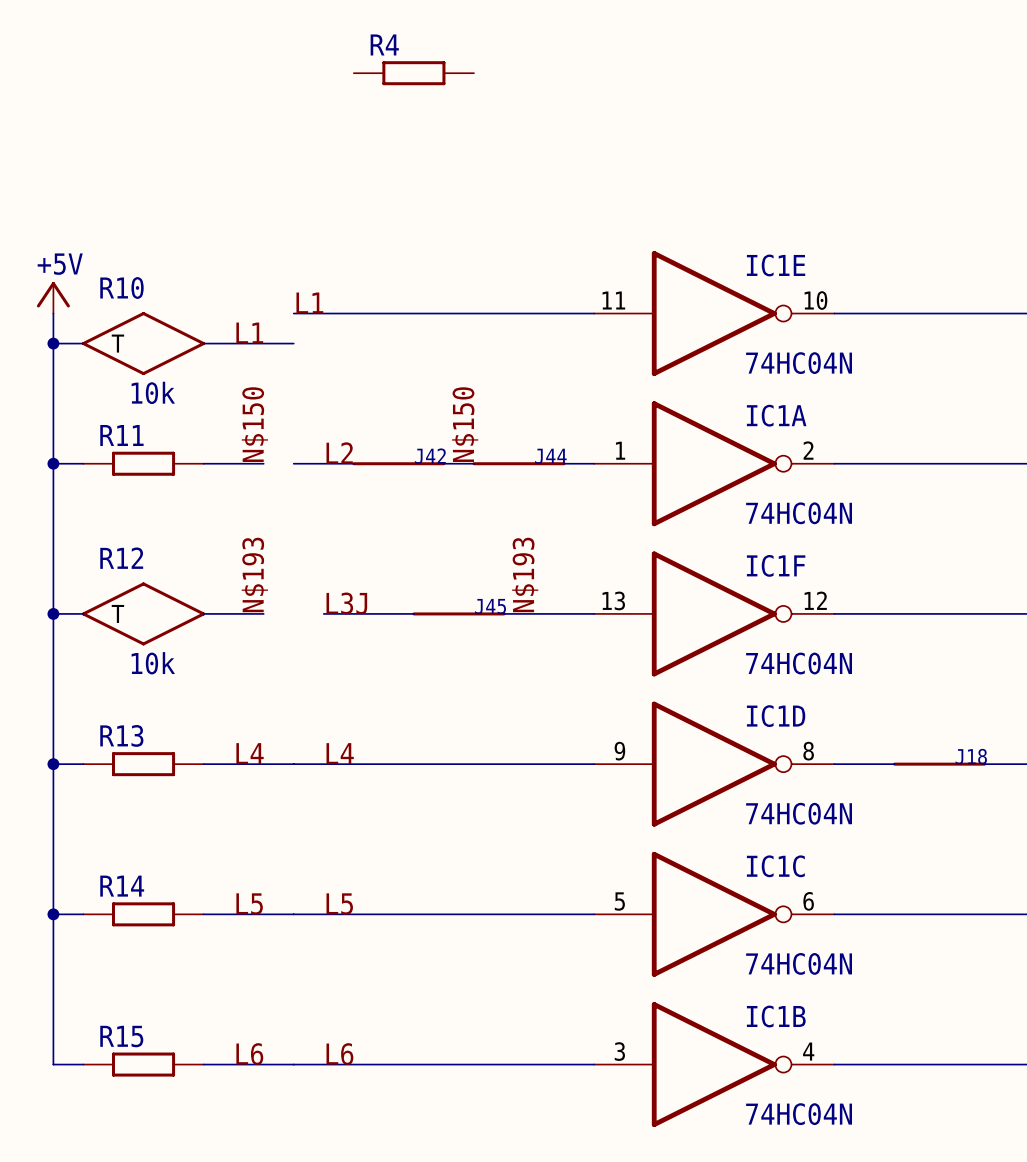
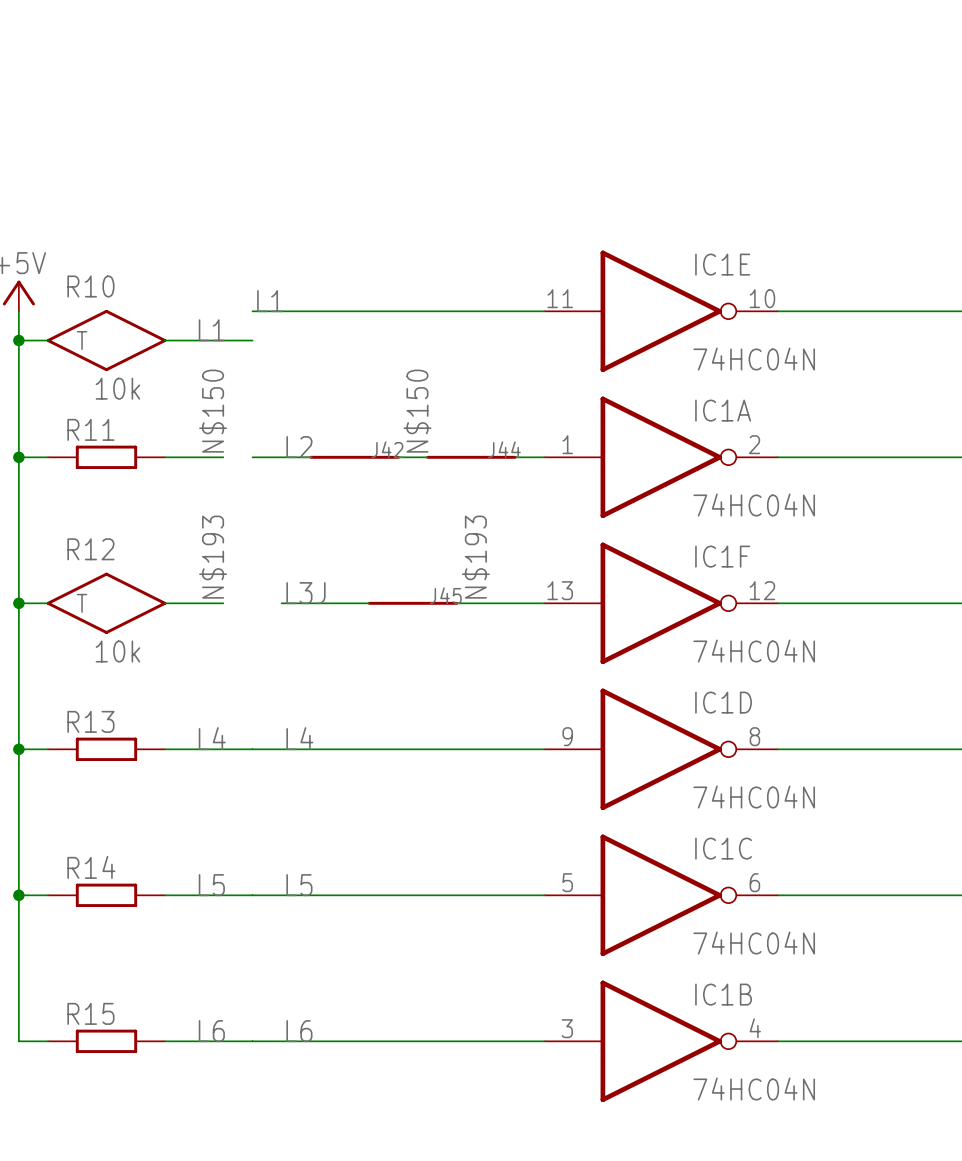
R4: (413, 73) -> none
J18: (939, 764) -> none

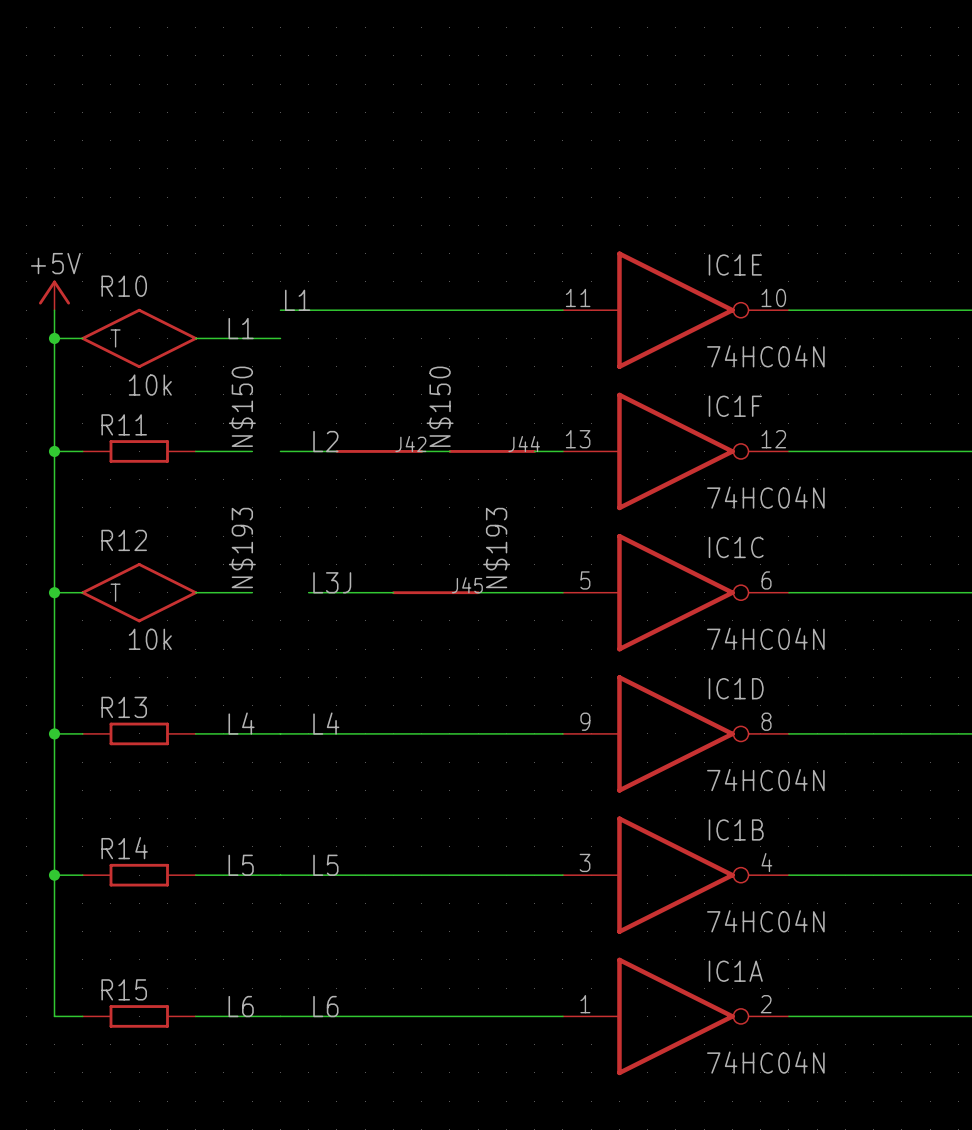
IC1A position: (661, 457) -> (675, 1016)
IC1F position: (661, 603) -> (675, 451)
IC1C position: (661, 895) -> (675, 592)
IC1B position: (661, 1041) -> (675, 875)

